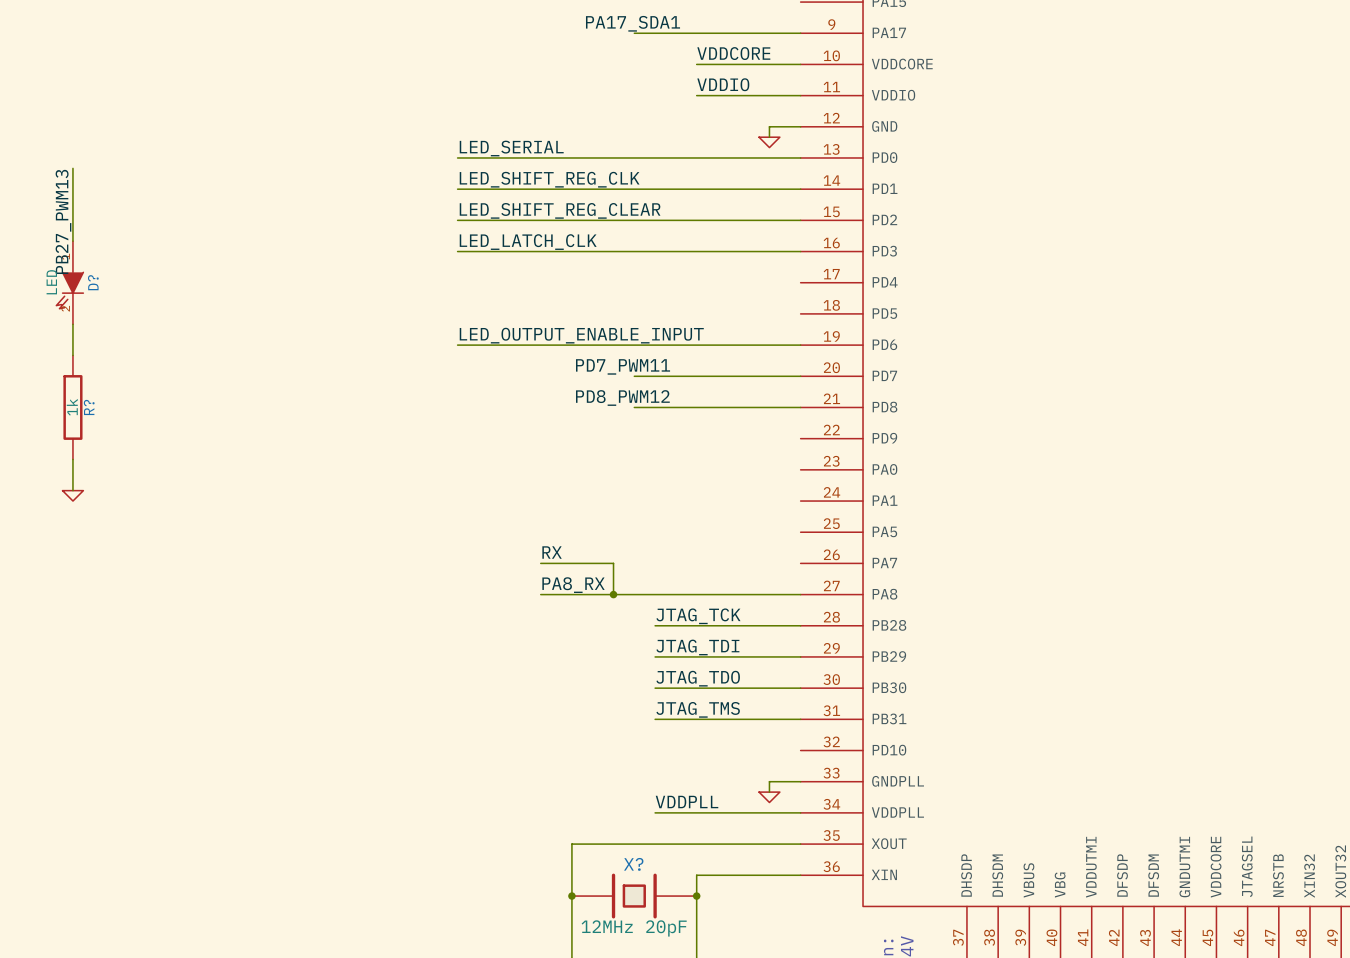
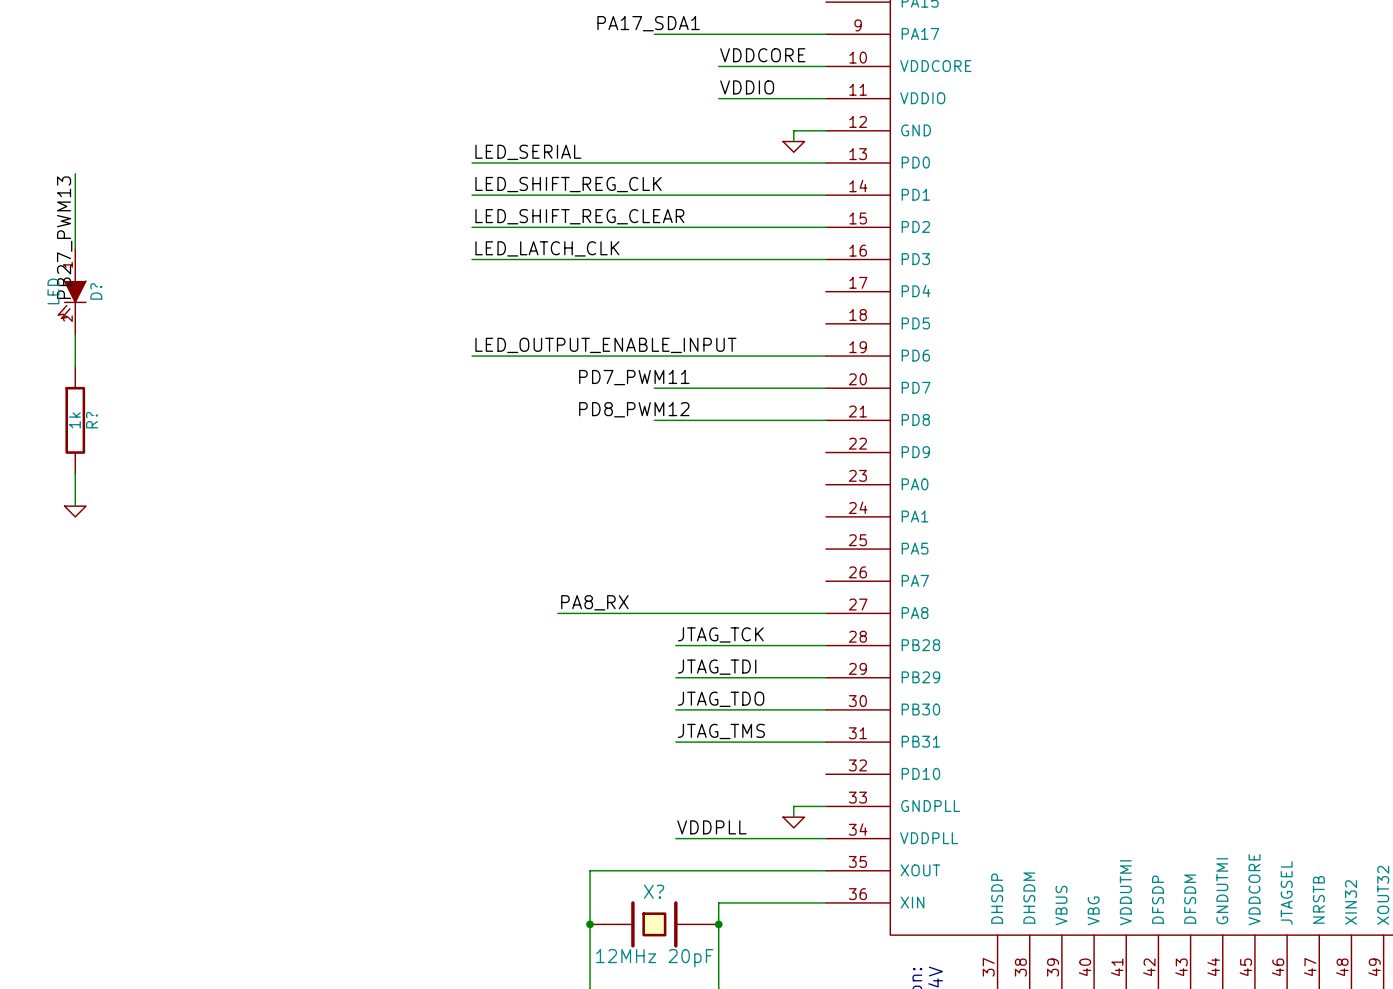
label: RX (552, 552) -> none
wire: (540, 563) (613, 563) (613, 594) -> none
junction: (613, 594) -> none

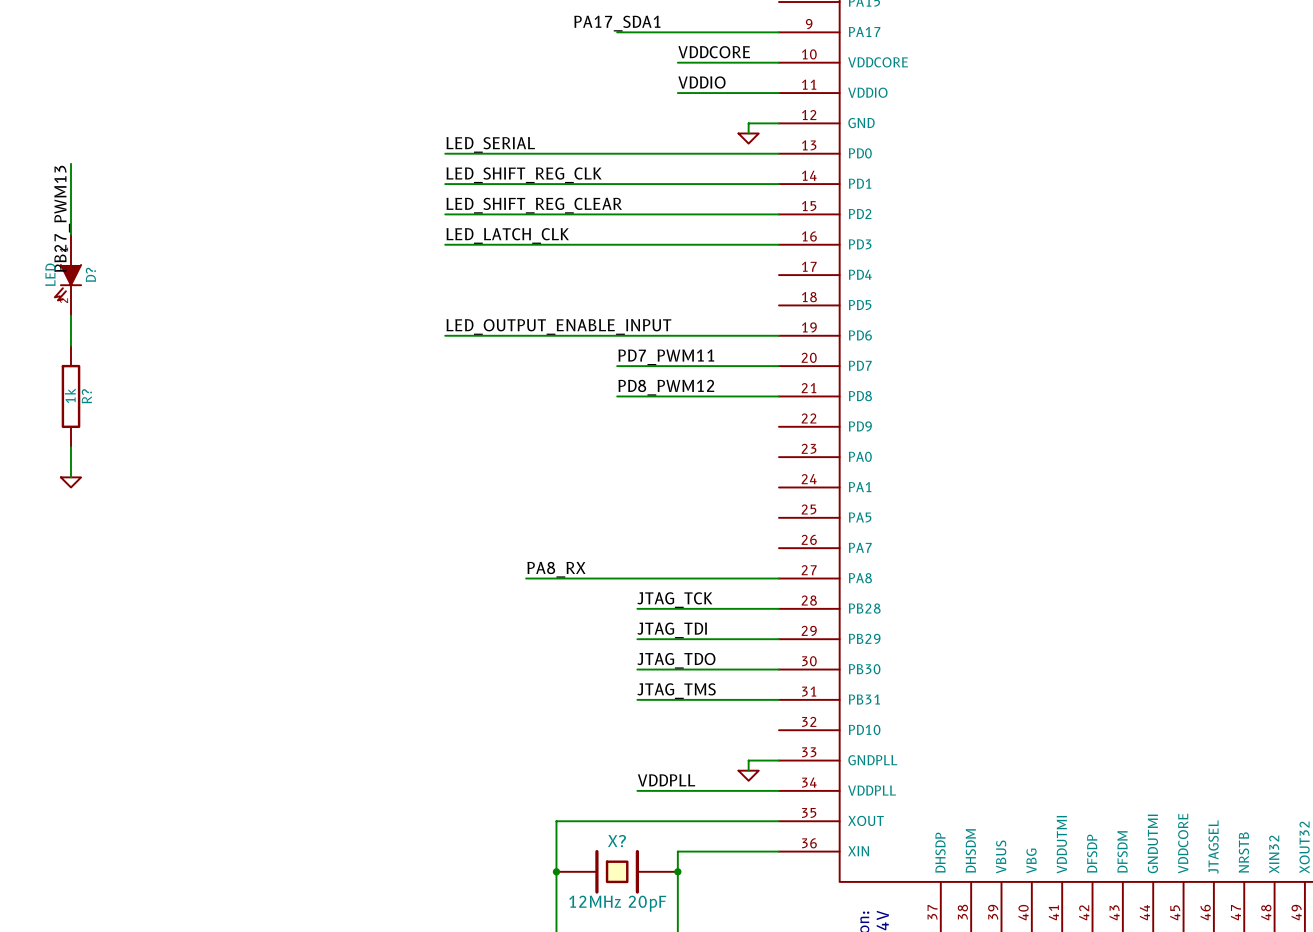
label position: PD7_PWM11 (634, 377) -> PD7_PWM11 (666, 357)
label position: PD8_PWM12 (634, 409) -> PD8_PWM12 (666, 387)

